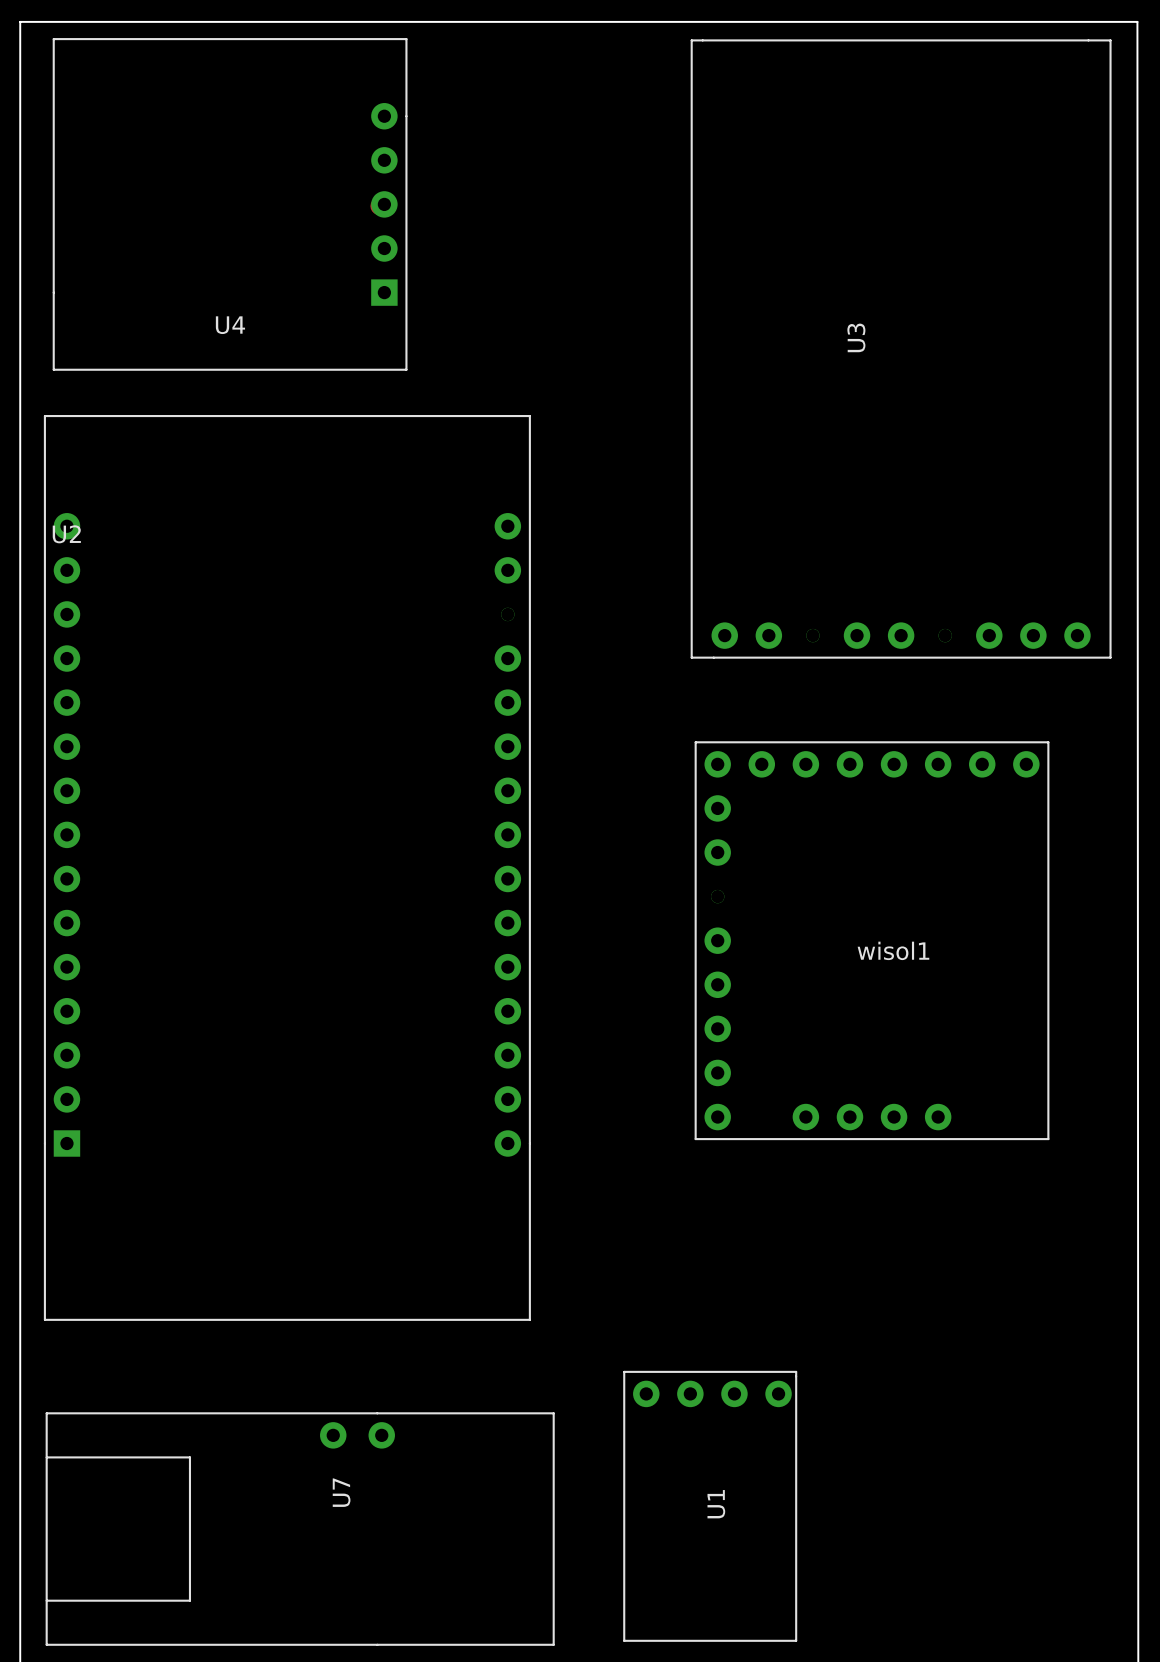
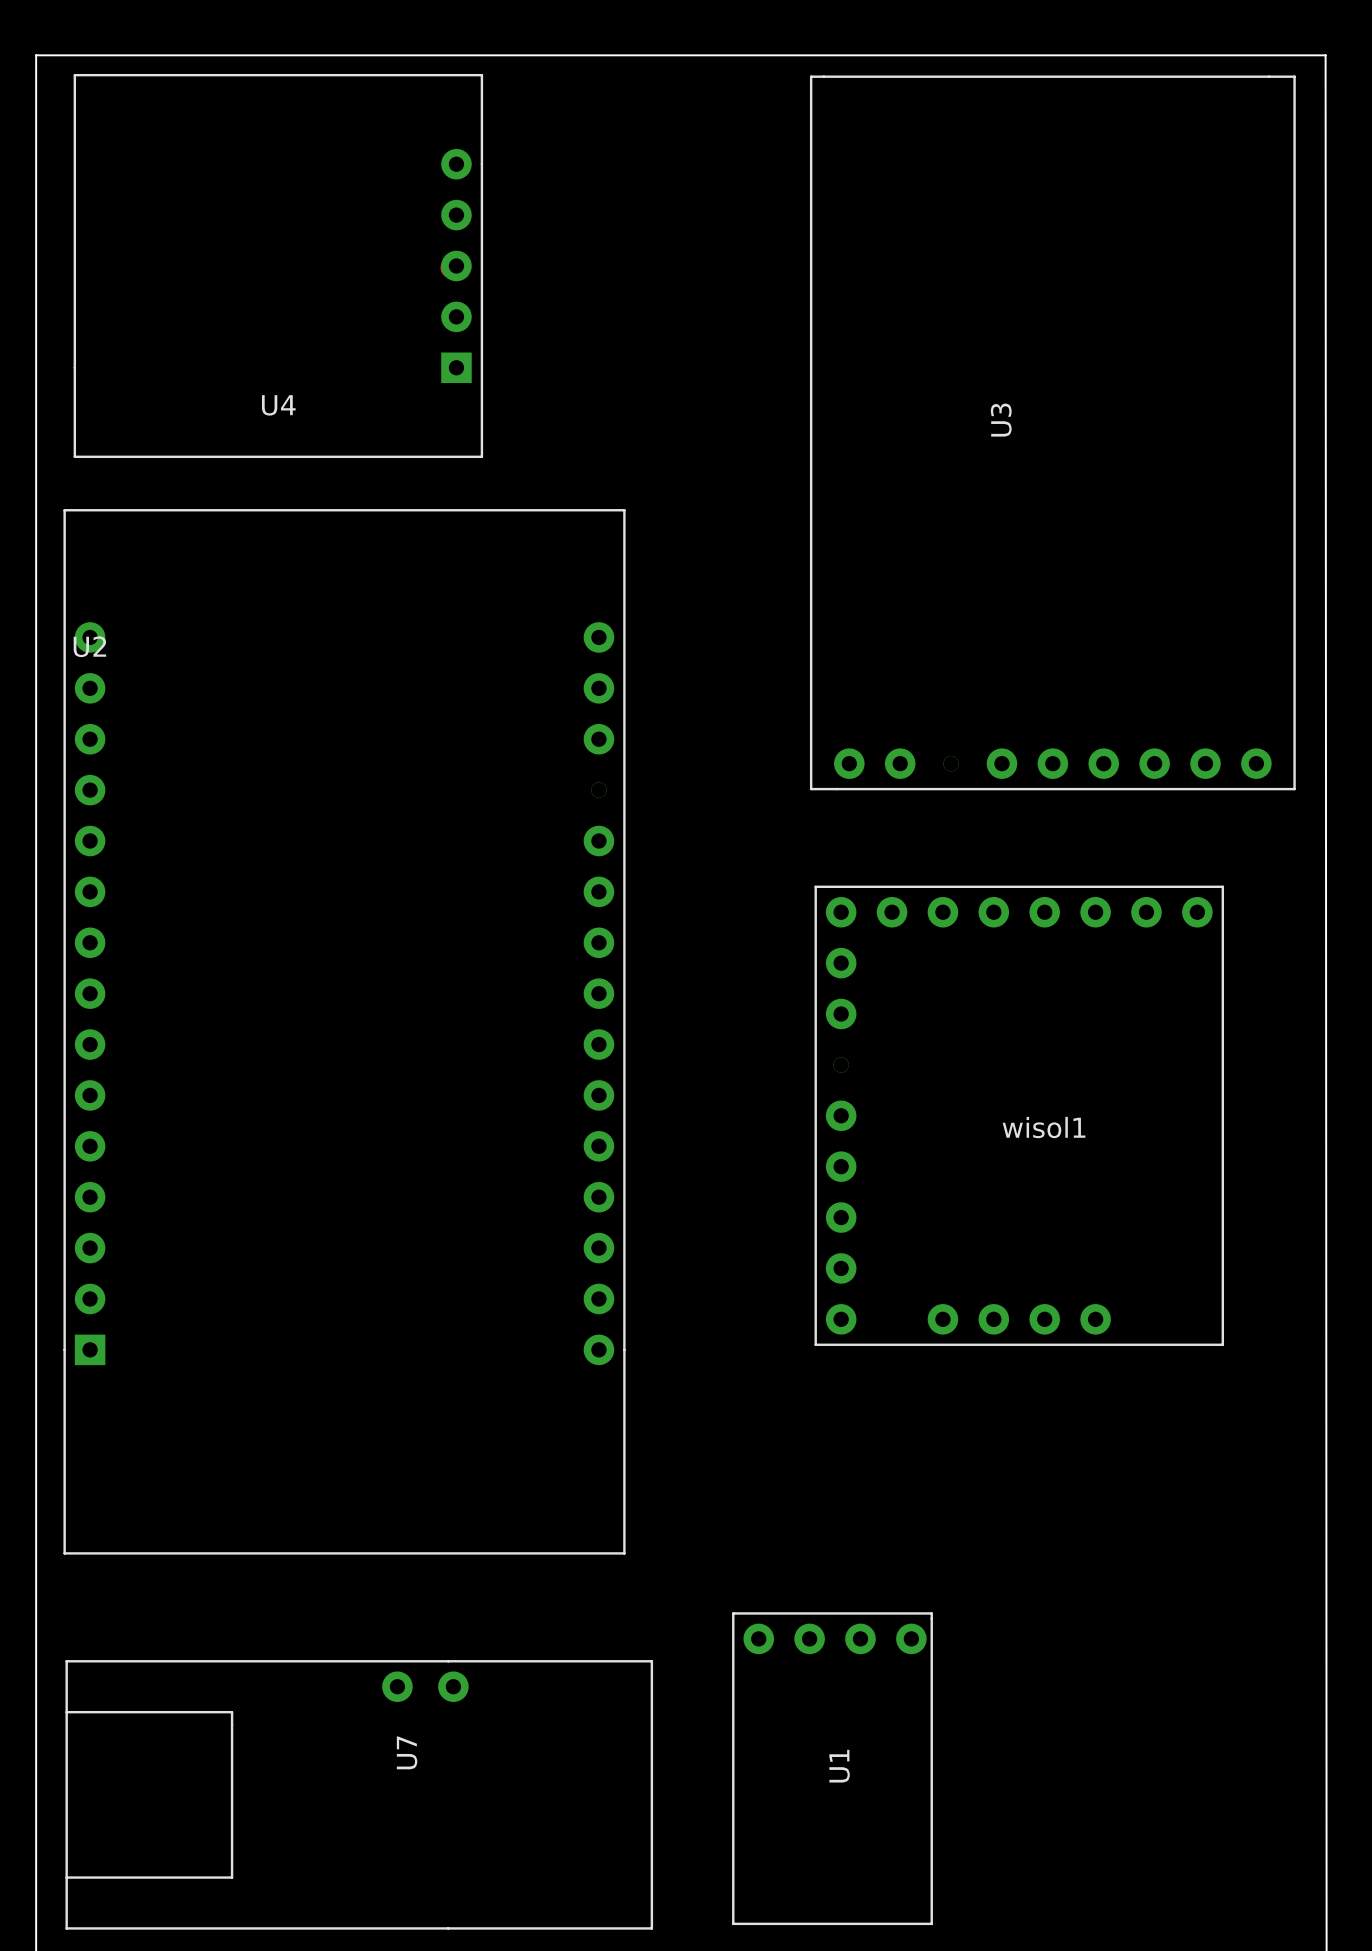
U3 footprint: [690, 39, 1112, 659] -> [809, 75, 1296, 791]
U2 footprint: [43, 415, 531, 1321] -> [63, 509, 626, 1555]

